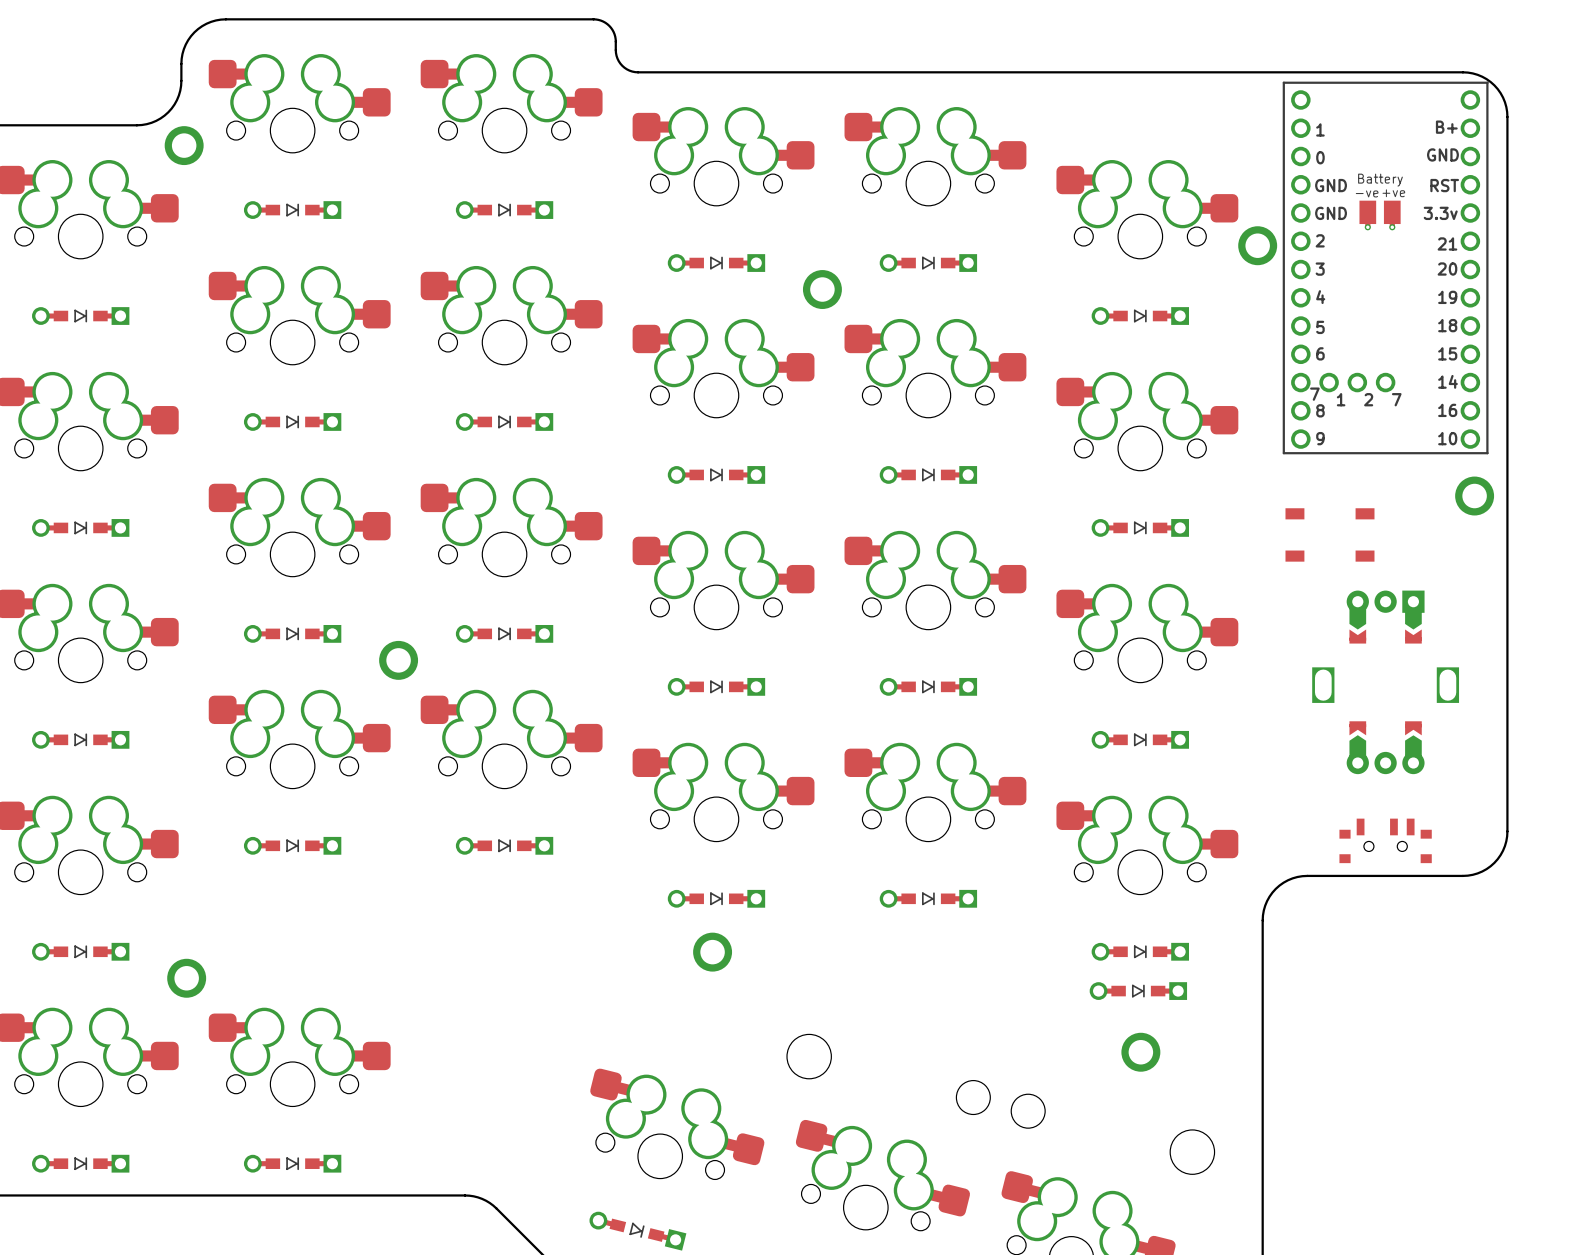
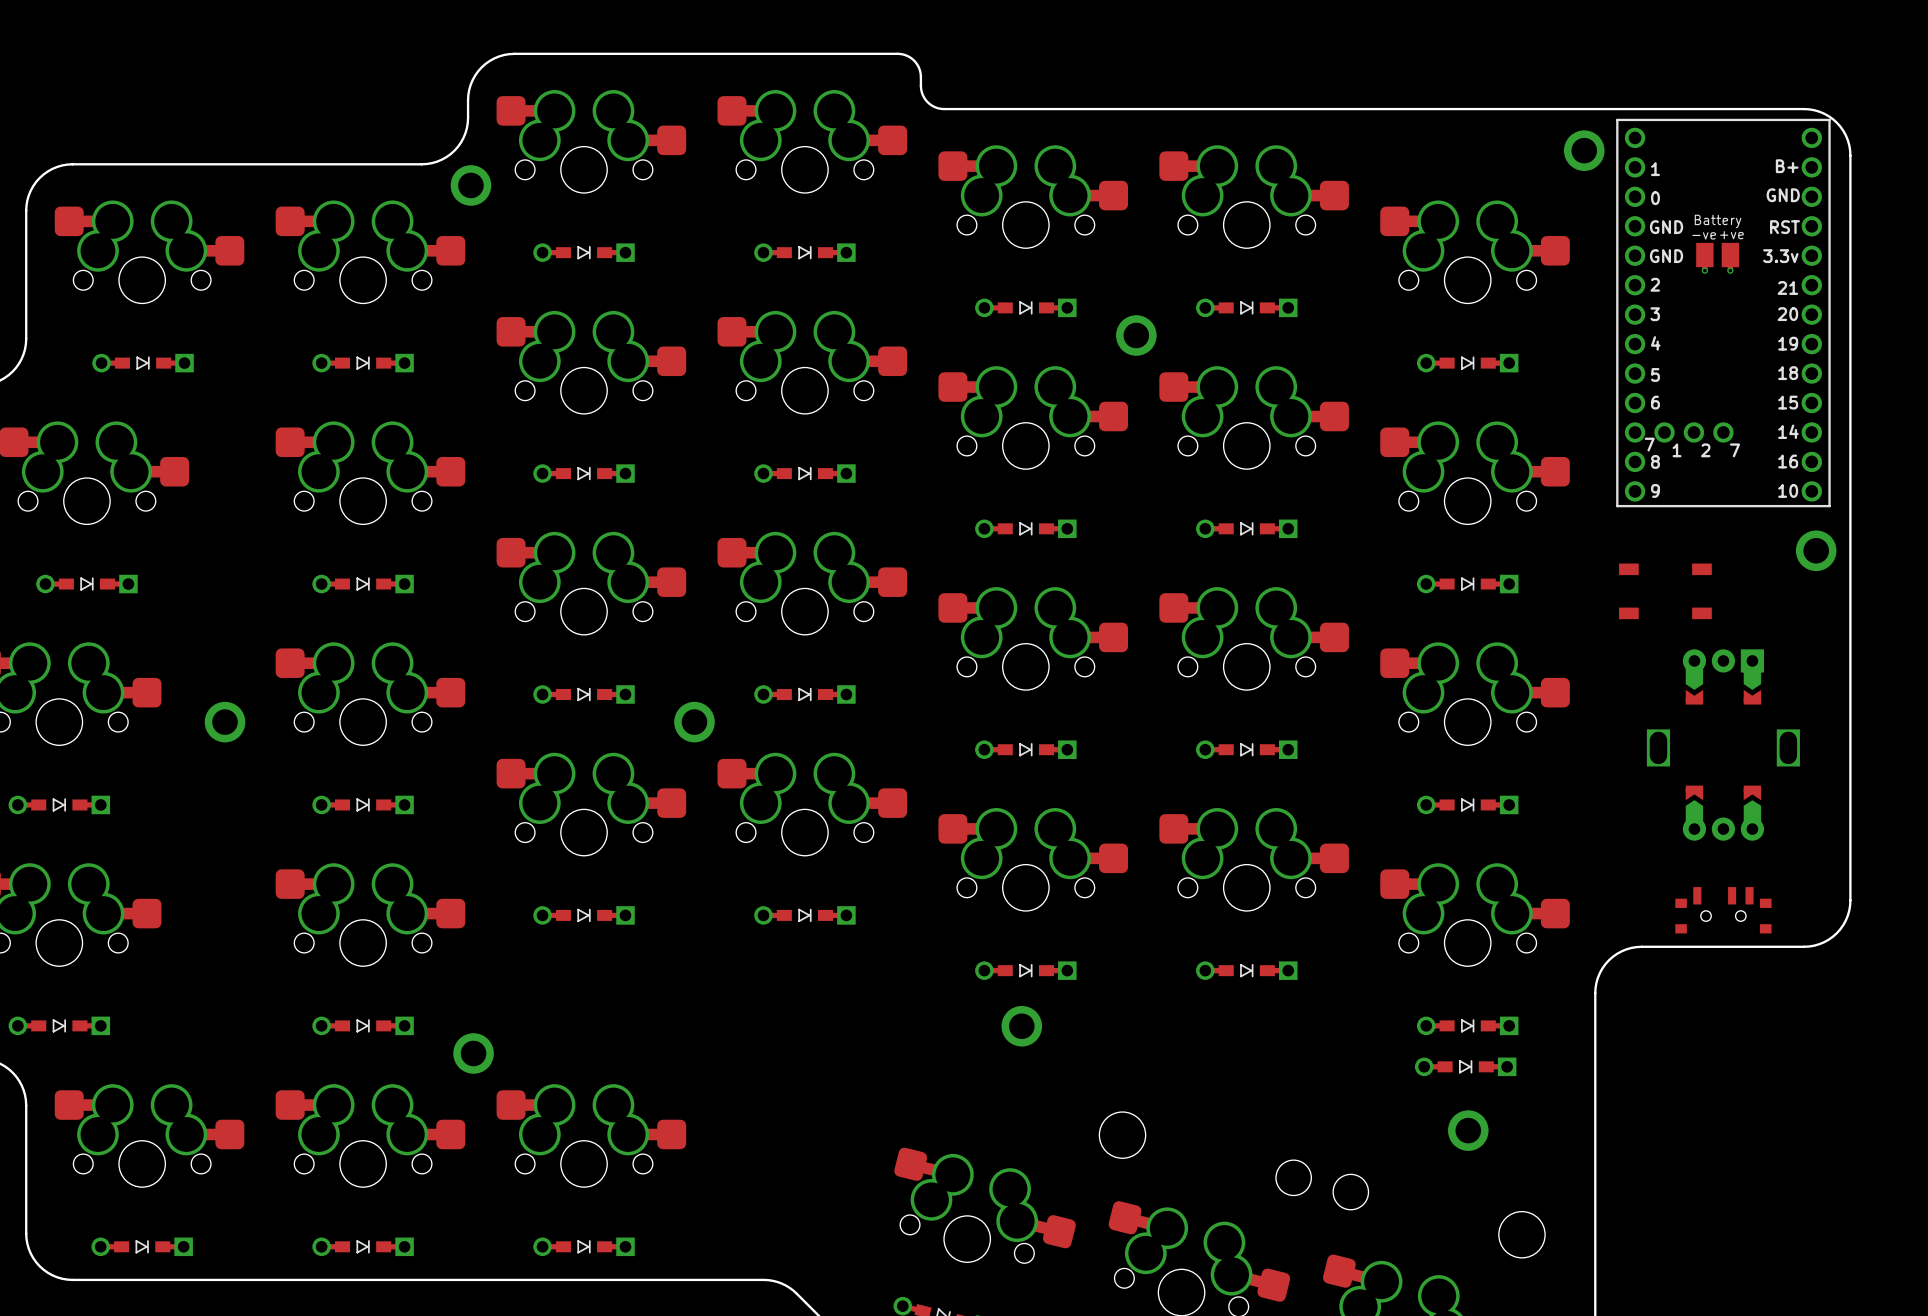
part position: (1257, 245) -> (1584, 150)

